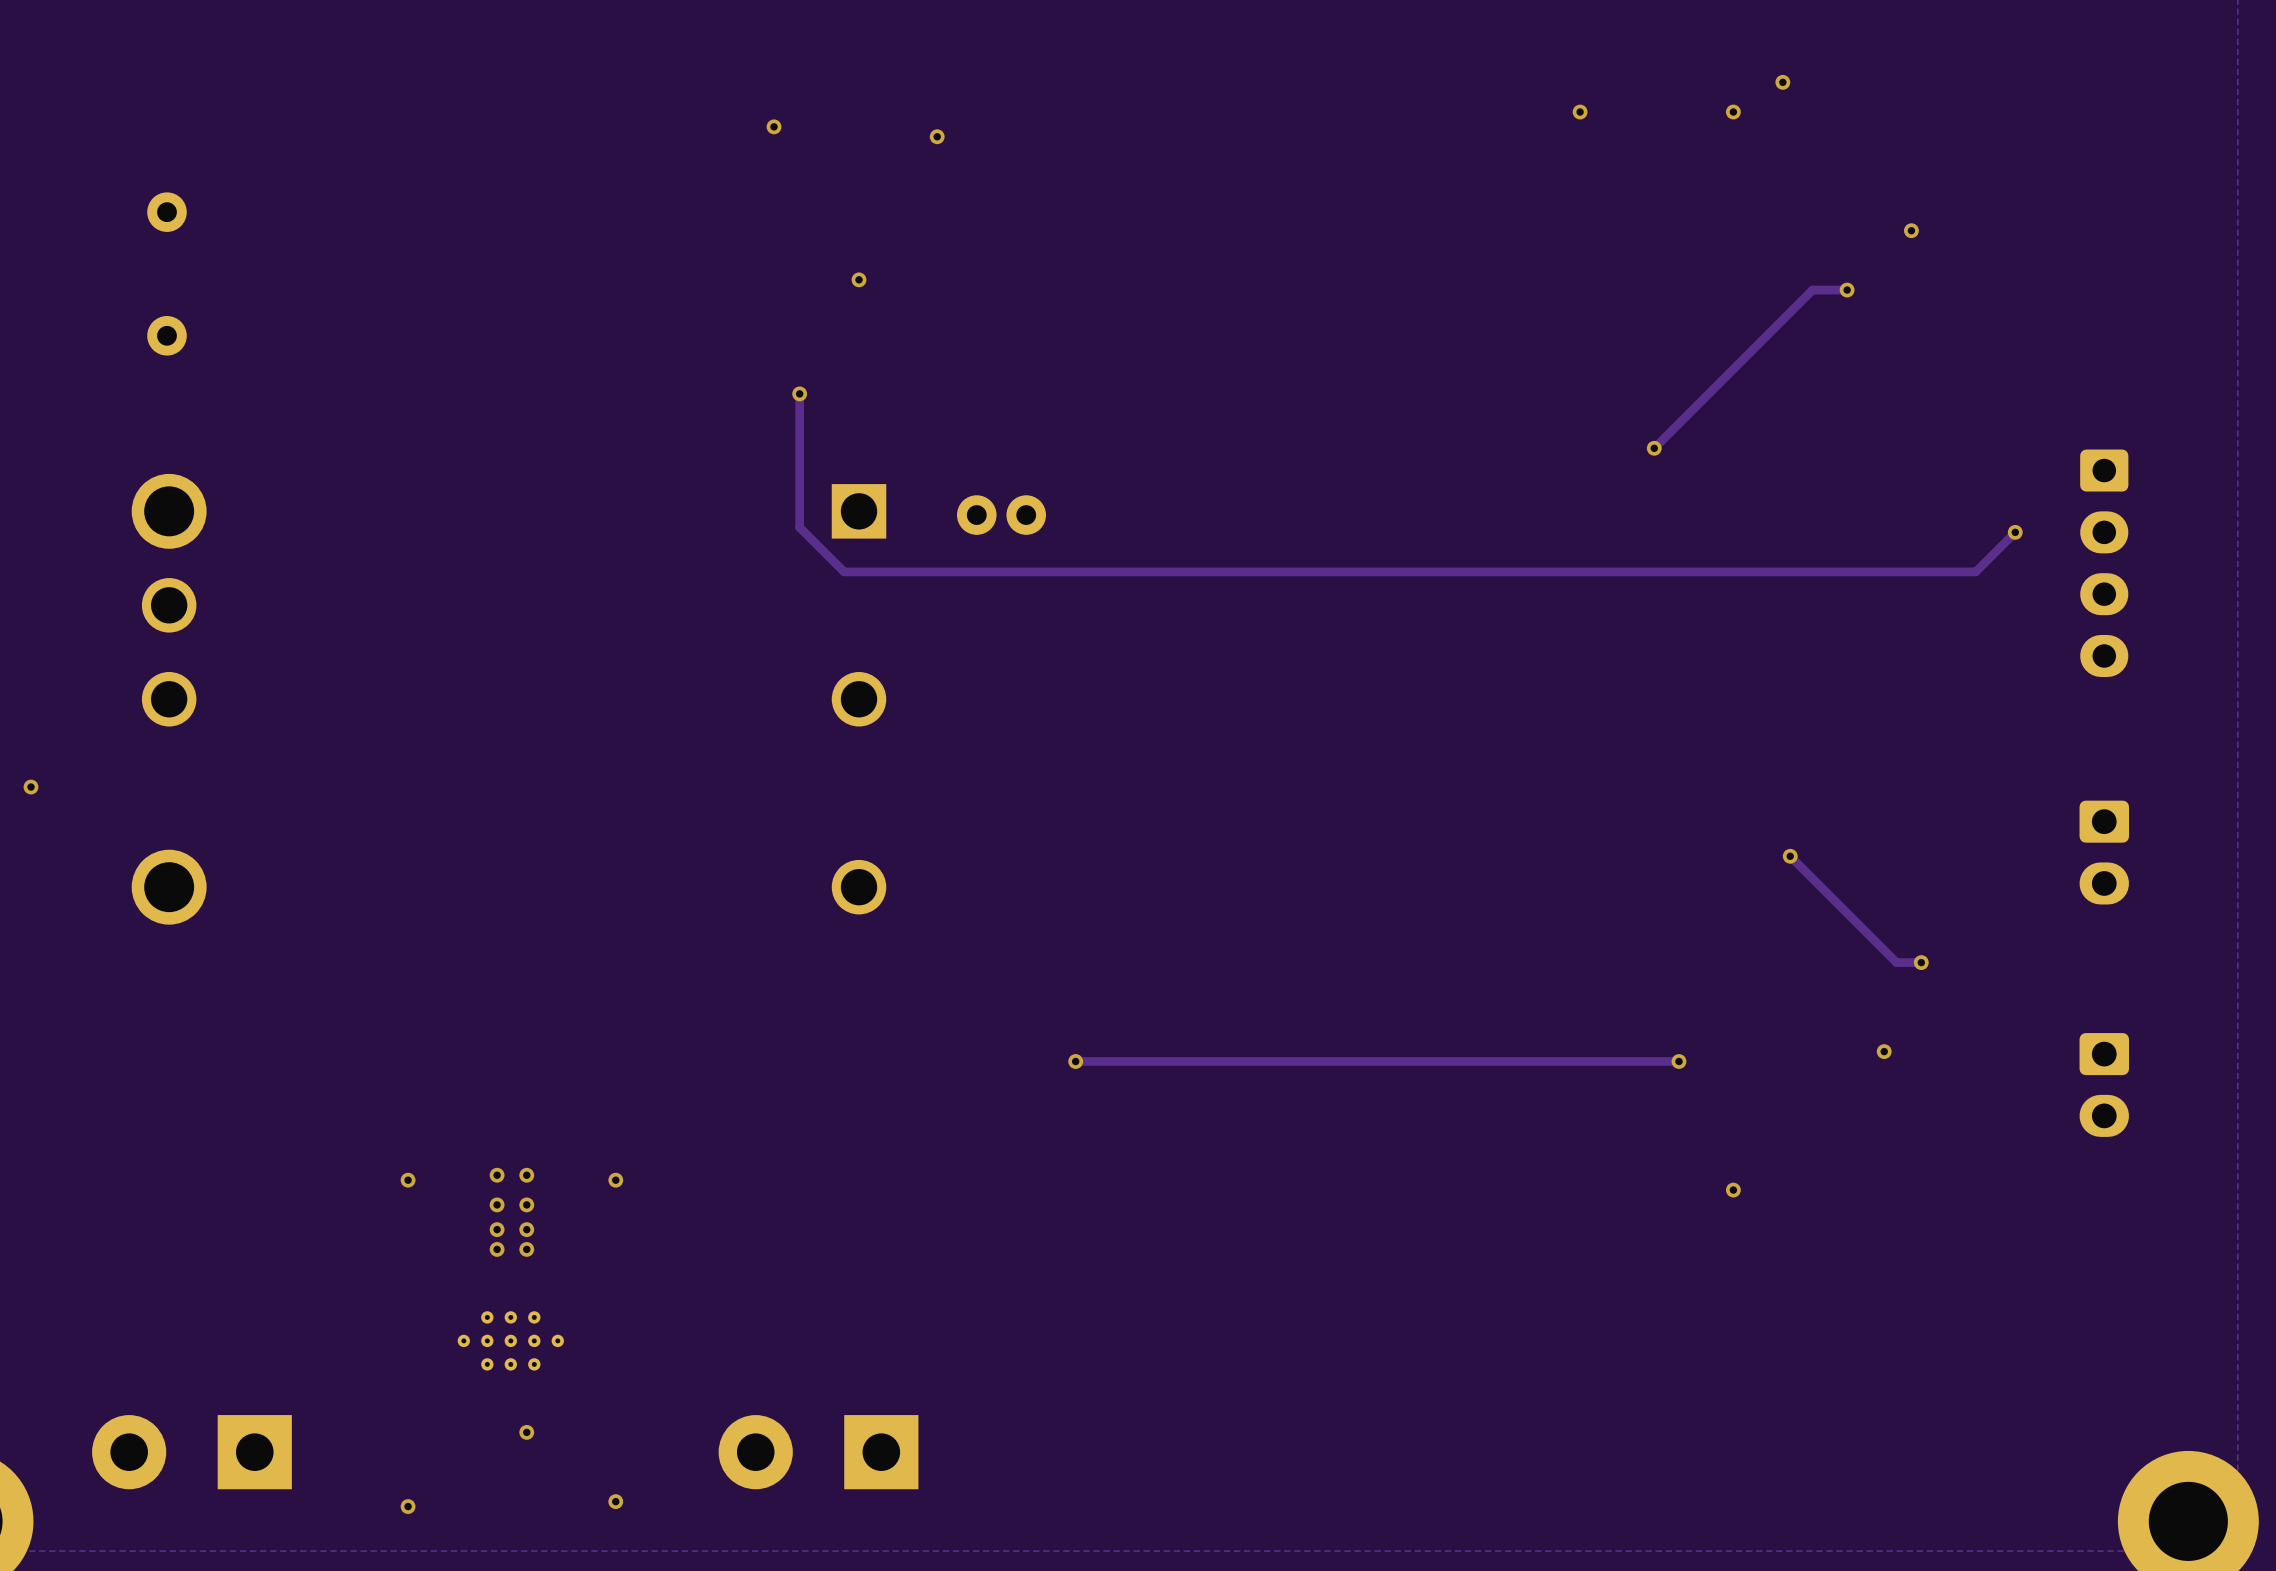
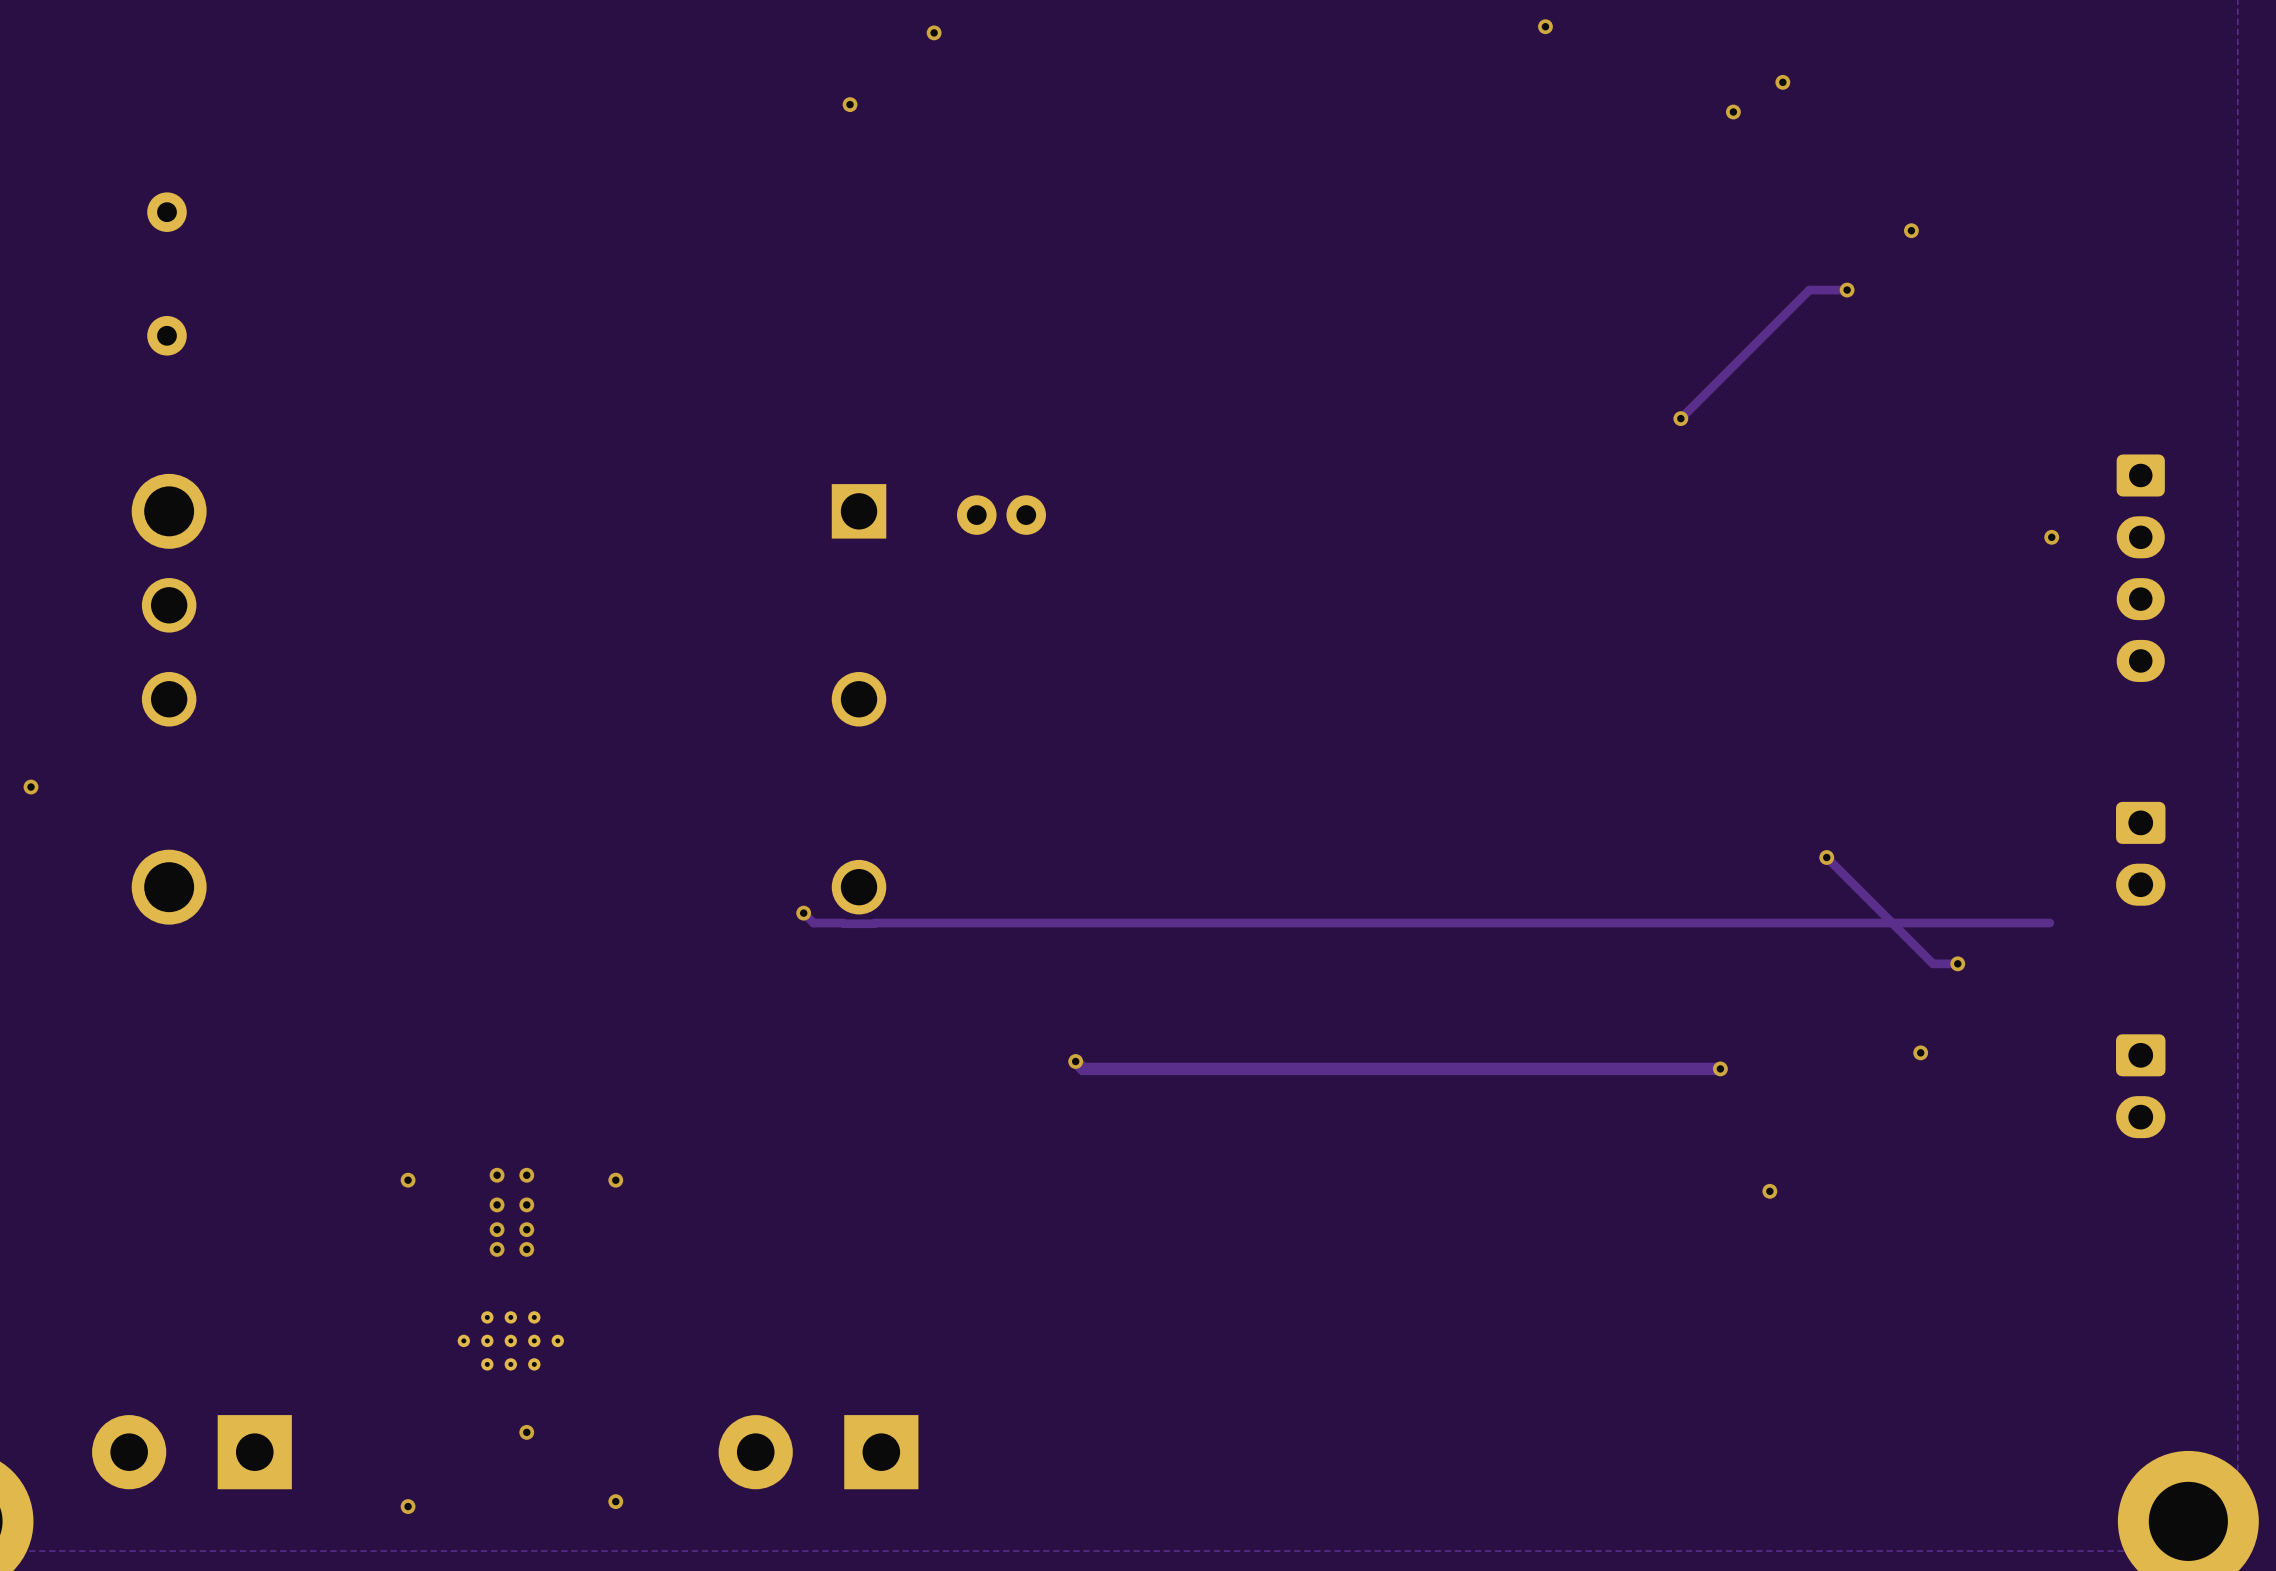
via: none -> (934, 32)
via: none -> (850, 104)
via position: (1580, 112) -> (1545, 26)
via: (774, 126) -> none
via: (937, 136) -> none
via: (859, 279) -> none
track: (1812, 290) (1654, 448) -> (1812, 290) (1809, 290) (1680, 418)
track: (799, 393) (799, 527) (844, 571) (1975, 571) (2015, 532) -> none
via: (799, 393) -> none
via position: (1654, 448) -> (1680, 418)
via position: (2015, 532) -> (2051, 537)
part position: (2104, 563) -> (2140, 568)
part position: (2104, 852) -> (2140, 853)
track: (1790, 856) (1896, 962) (1921, 962) -> (1826, 857) (1933, 963) (1957, 963)
via position: (1790, 856) -> (1826, 857)
track: none -> (803, 913) (813, 923) (843, 923) (2049, 923)
via: none -> (803, 913)
via position: (1921, 962) -> (1957, 963)
via position: (1884, 1051) -> (1920, 1052)
track: (1678, 1061) (1075, 1061) -> (1720, 1068) (1083, 1068) (1075, 1061)
via position: (1678, 1061) -> (1720, 1068)
part position: (2104, 1084) -> (2140, 1086)
via position: (1733, 1190) -> (1769, 1191)

